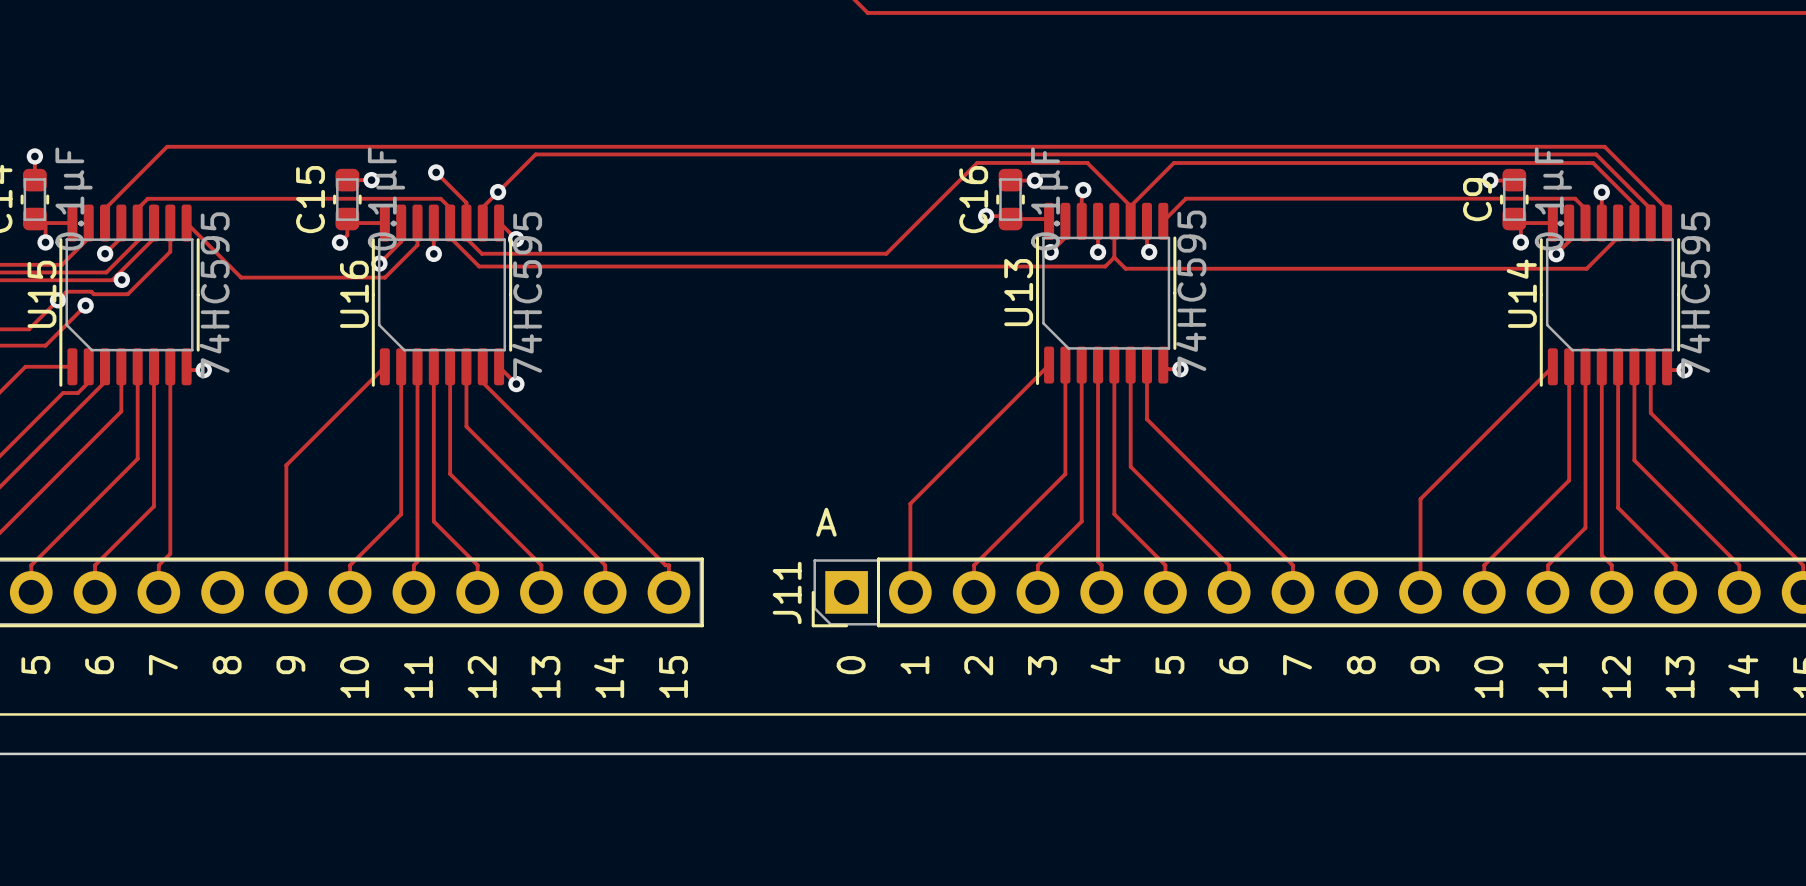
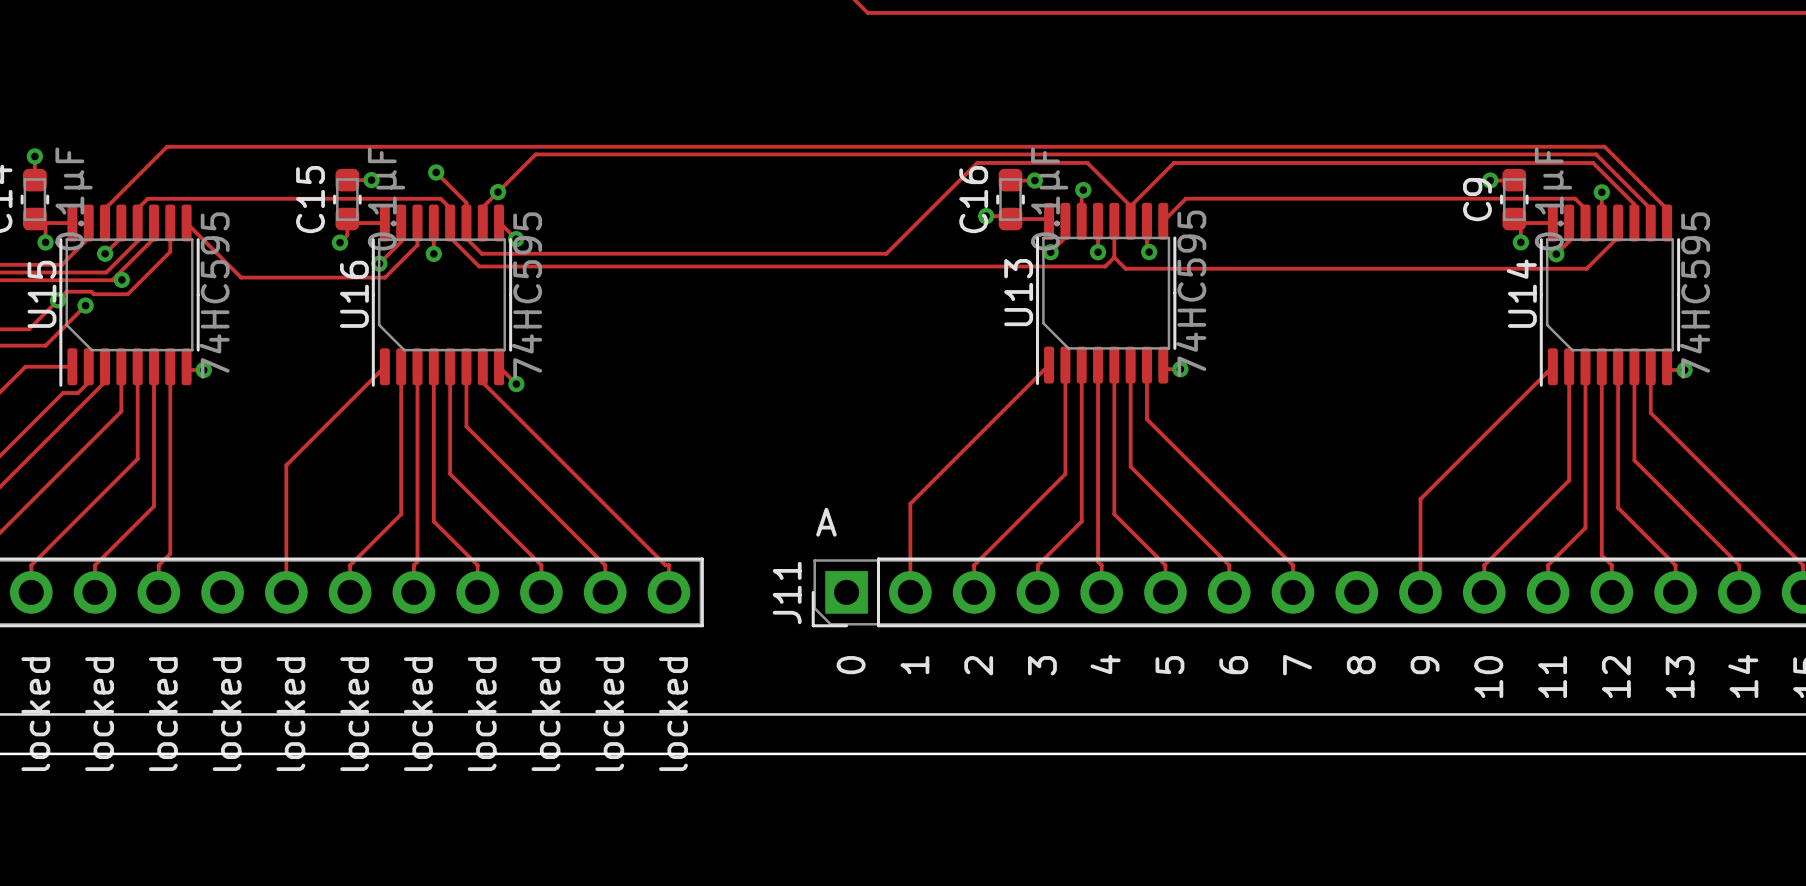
text: 5 (35, 665) -> locked (35, 714)
text: 6 (99, 665) -> locked (99, 714)
text: 7 (163, 665) -> locked (163, 714)
text: 8 (227, 665) -> locked (227, 714)
text: 9 (290, 665) -> locked (290, 714)
text: 14 (609, 676) -> locked (609, 714)
text: 10 (354, 677) -> locked (354, 714)
text: 11 (418, 677) -> locked (418, 714)
text: 12 (482, 677) -> locked (482, 714)
text: 13 (545, 677) -> locked (545, 714)
text: 15 (673, 677) -> locked (673, 714)

